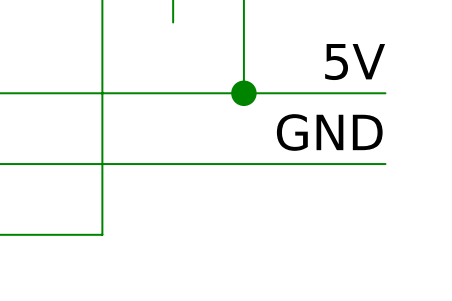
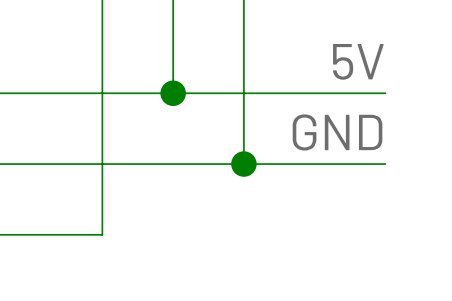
wire: none -> (173, 22) (173, 93)
junction: none -> (173, 93)
wire: none -> (243, 93) (243, 164)
junction: (243, 93) -> none
junction: none -> (243, 164)

